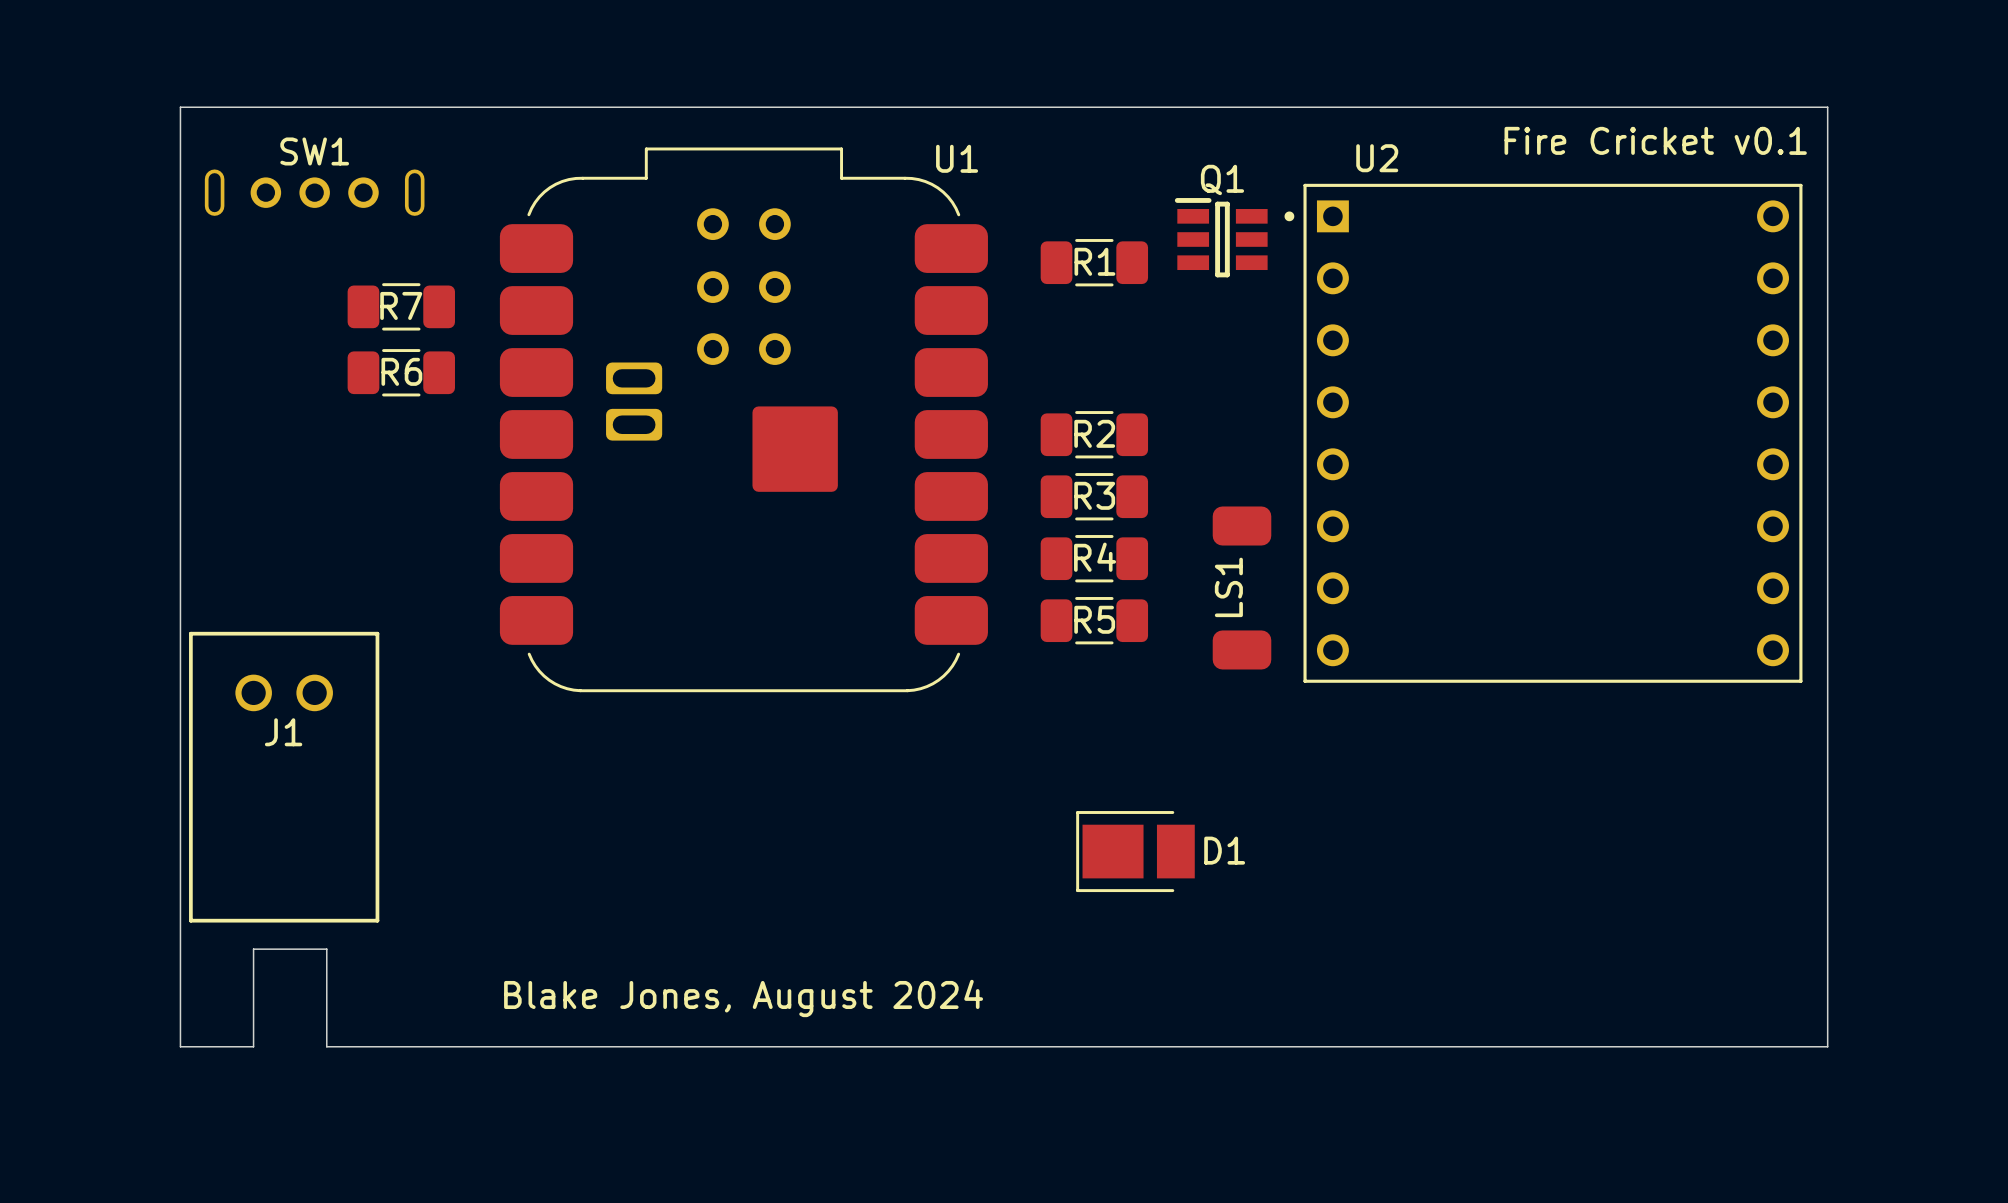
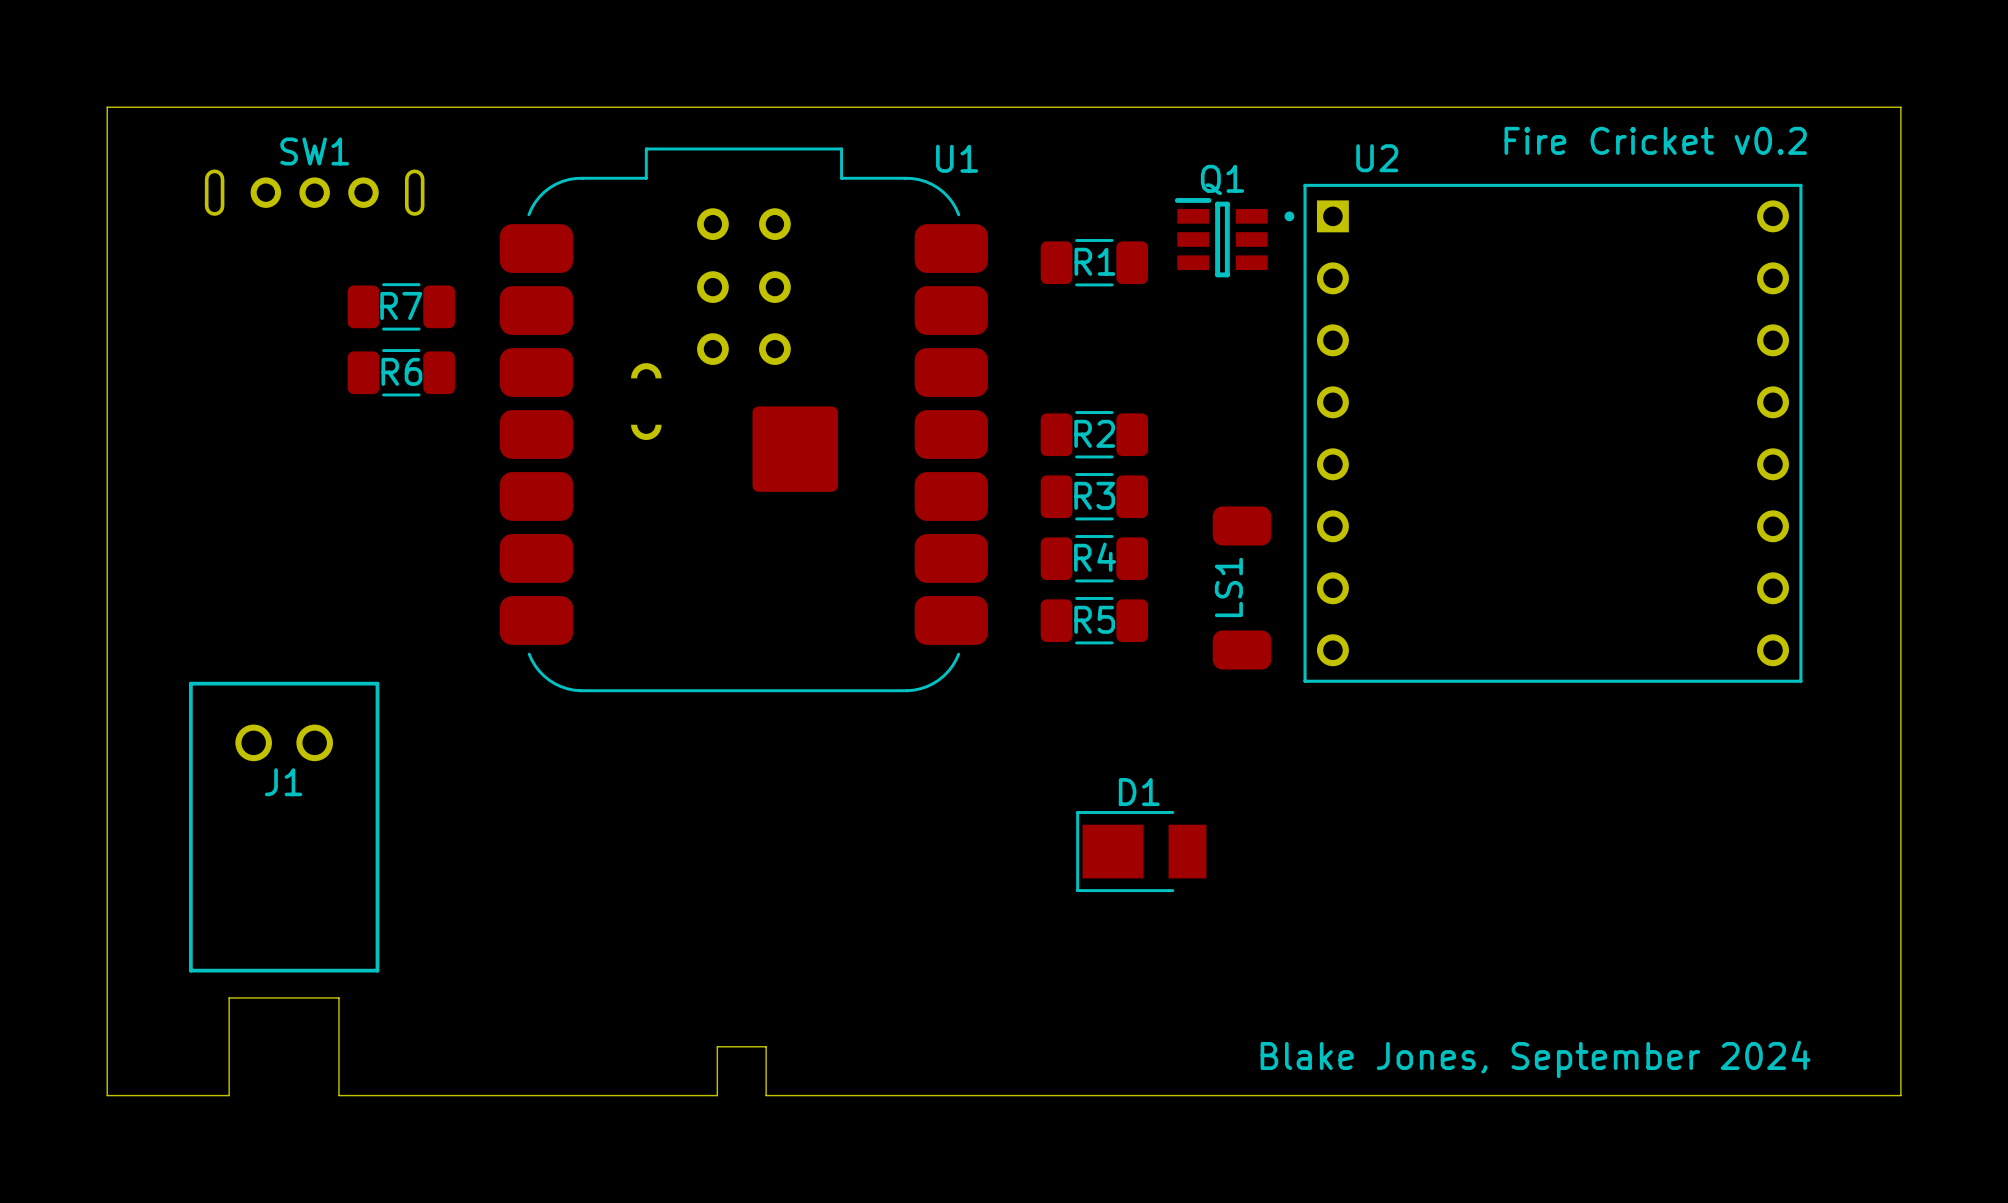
board edge: (180, 107) (180, 1046) (253, 1046) (253, 949) (326, 949) (326, 1046) (717, 1046) -> (180, 107) (107, 107) (107, 1095) (229, 1095) (229, 997) (338, 997) (338, 1095) (717, 1095) (717, 1046)
board edge: (1827, 107) (1827, 1046) (766, 1046) -> (1827, 107) (1900, 107) (1900, 1095) (766, 1095) (766, 1046)
text: Fire Cricket v0.1 (1655, 140) -> Fire Cricket v0.2 (1655, 140)
U1 footprint: [499, 147, 988, 693] -> [499, 147, 988, 693]
J1 position: (284, 777) -> (284, 827)
D1 footprint: [1076, 811, 1195, 893] -> [1076, 811, 1207, 893]
D1 name position: D1 (1224, 850) -> D1 (1139, 792)
text: Blake Jones, August 2024 (743, 998) -> none
text: none -> Blake Jones, September 2024 (1535, 1059)

